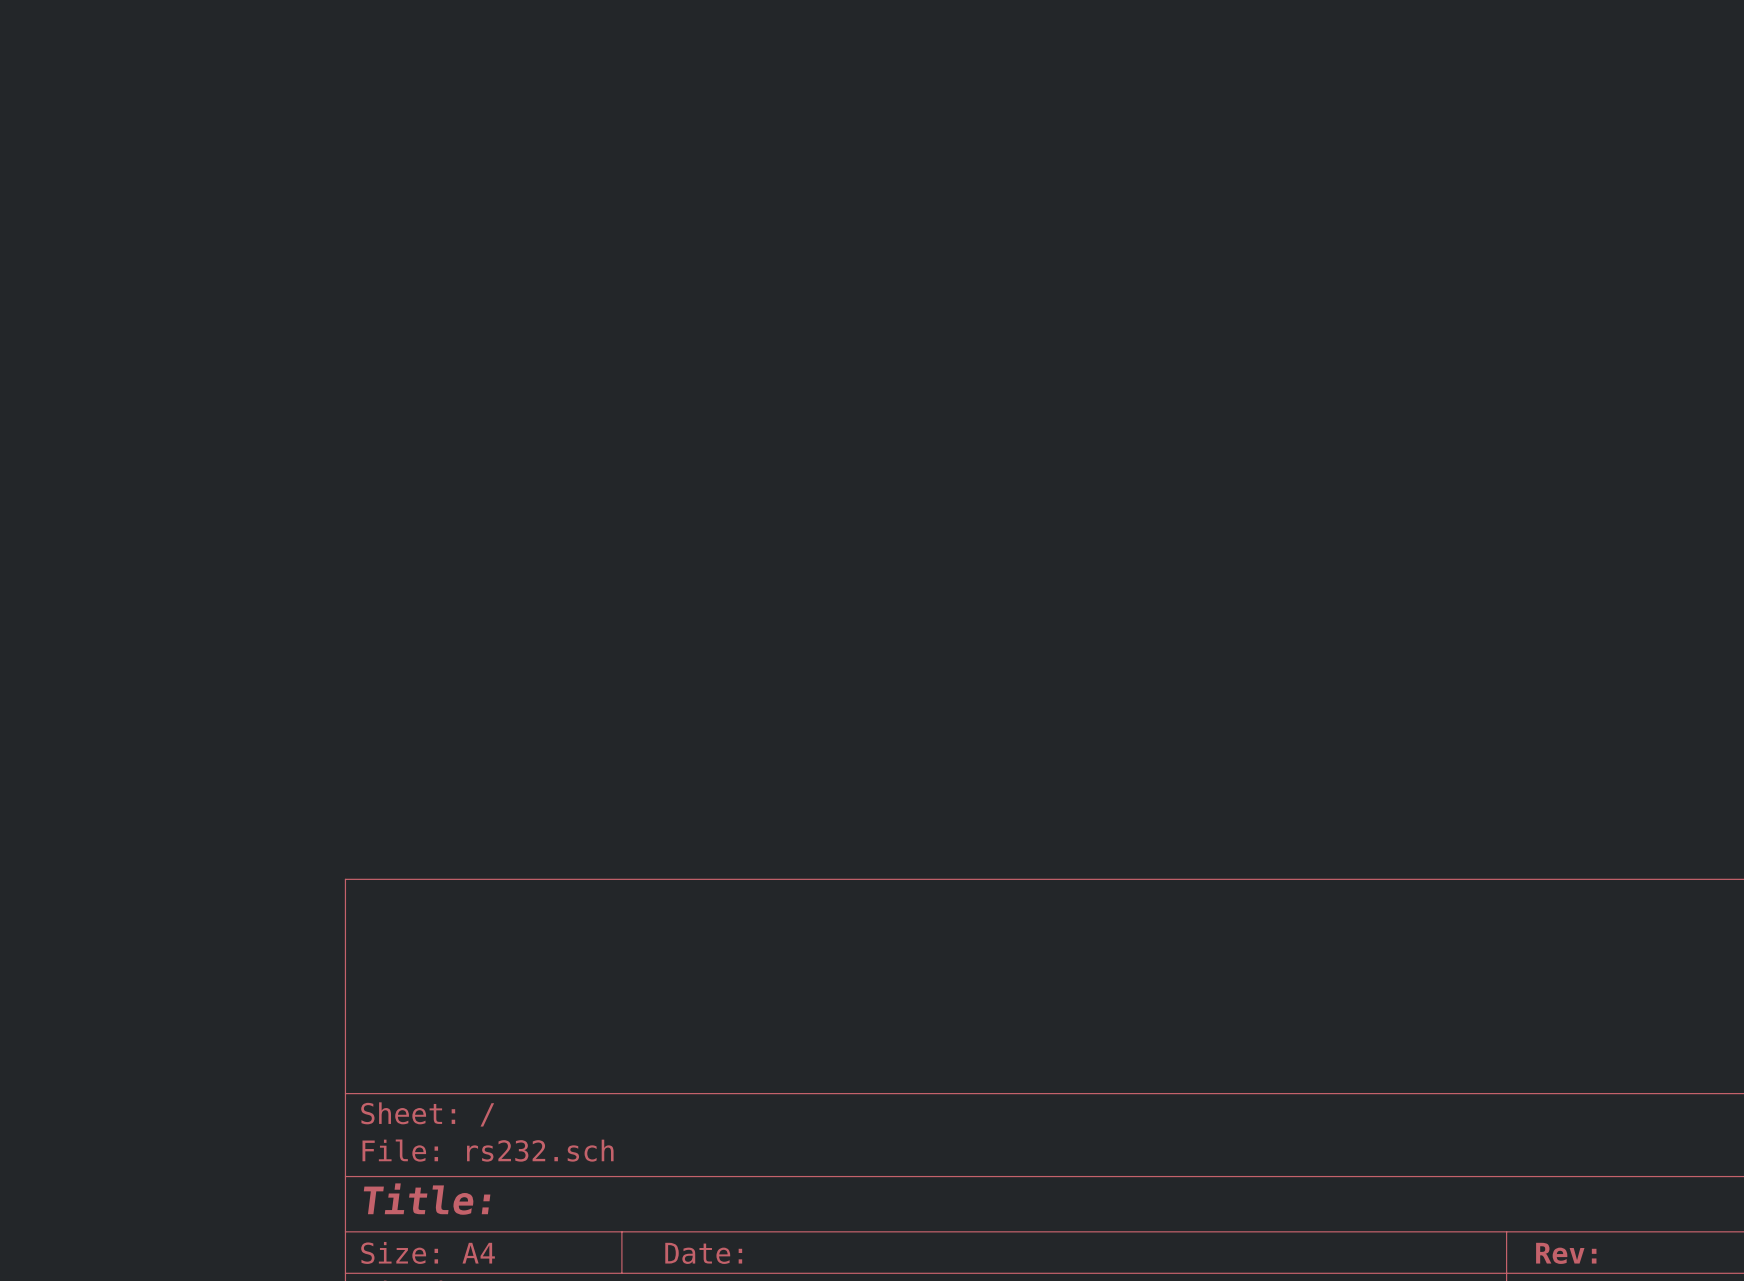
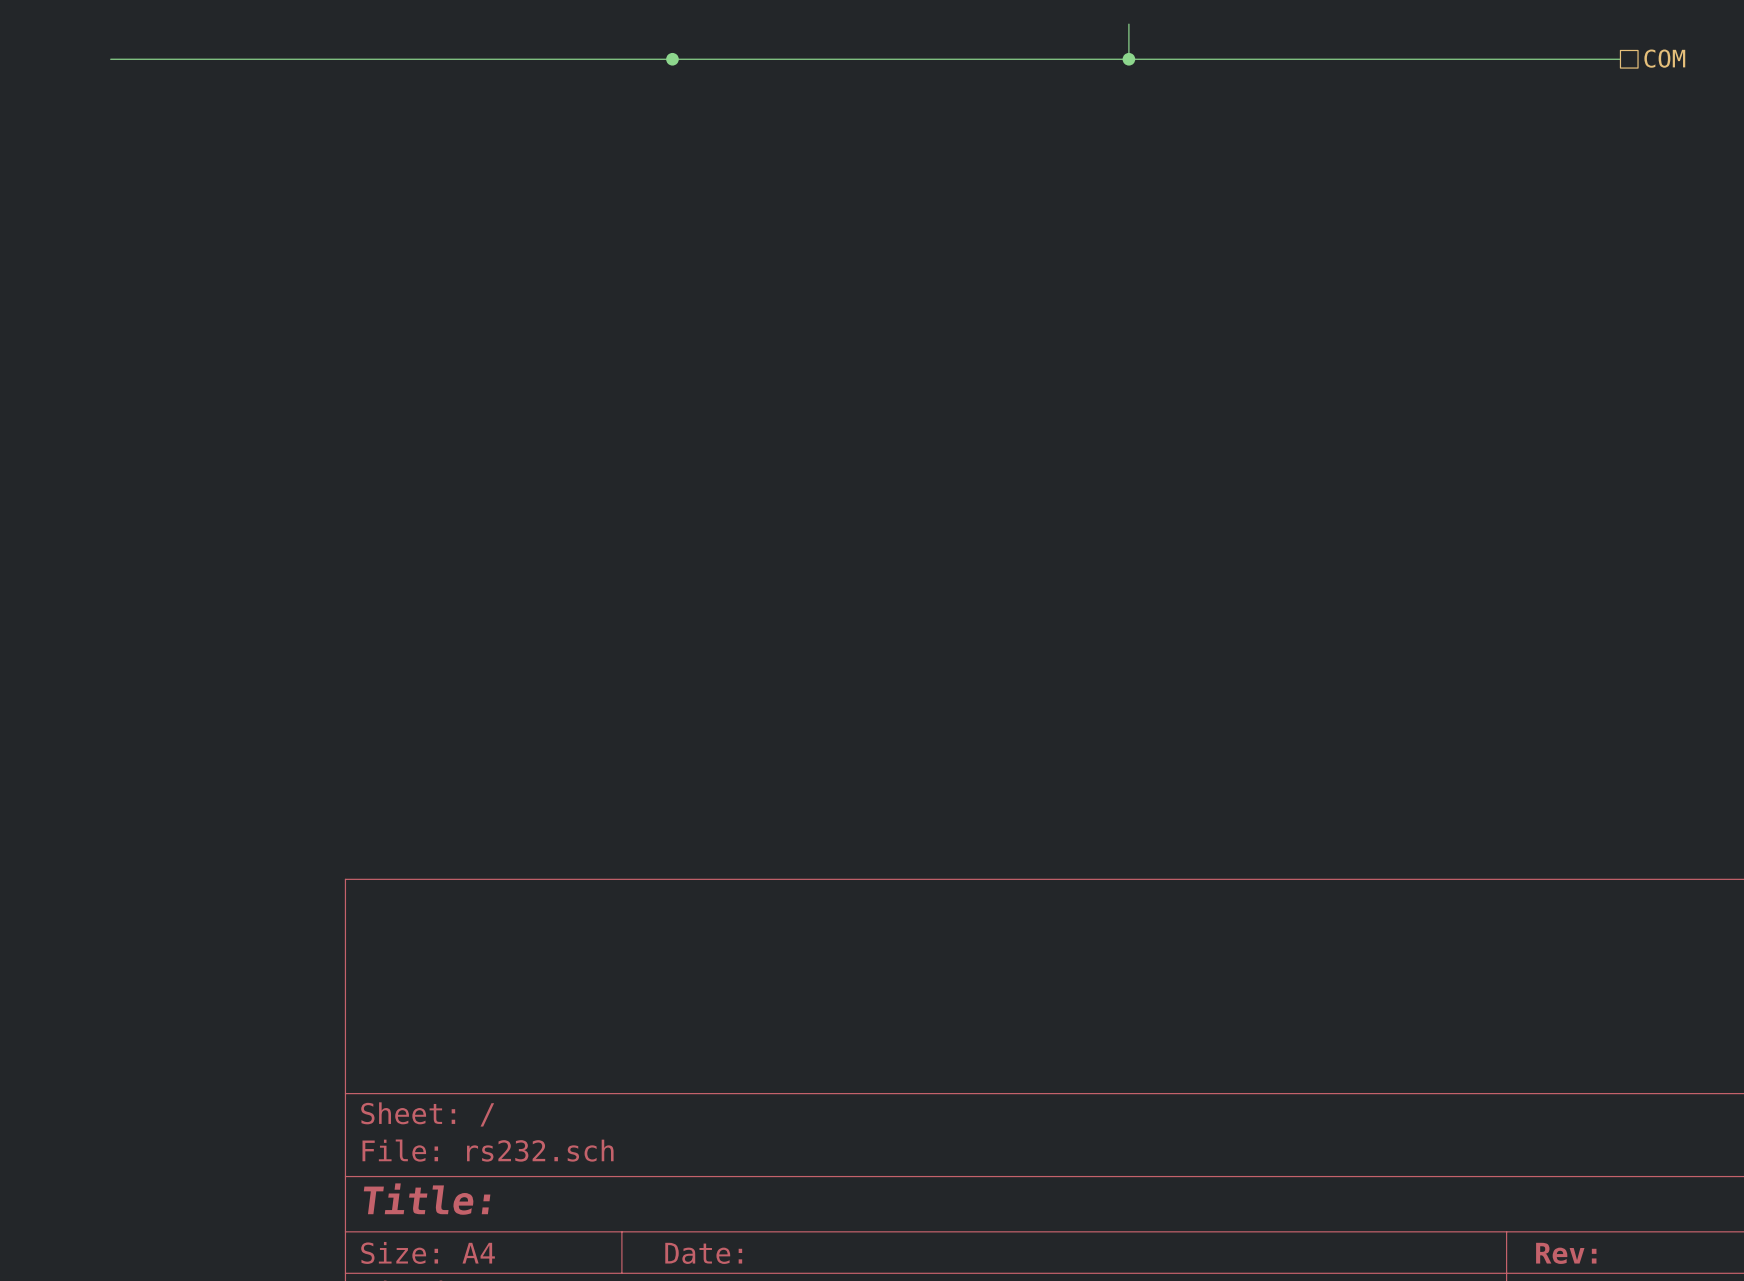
wire: none -> (1128, 24) (1128, 59)
hierarchical label: none -> COM (1664, 58)
wire: none -> (110, 59) (1620, 59)
junction: none -> (672, 59)
junction: none -> (1128, 59)

